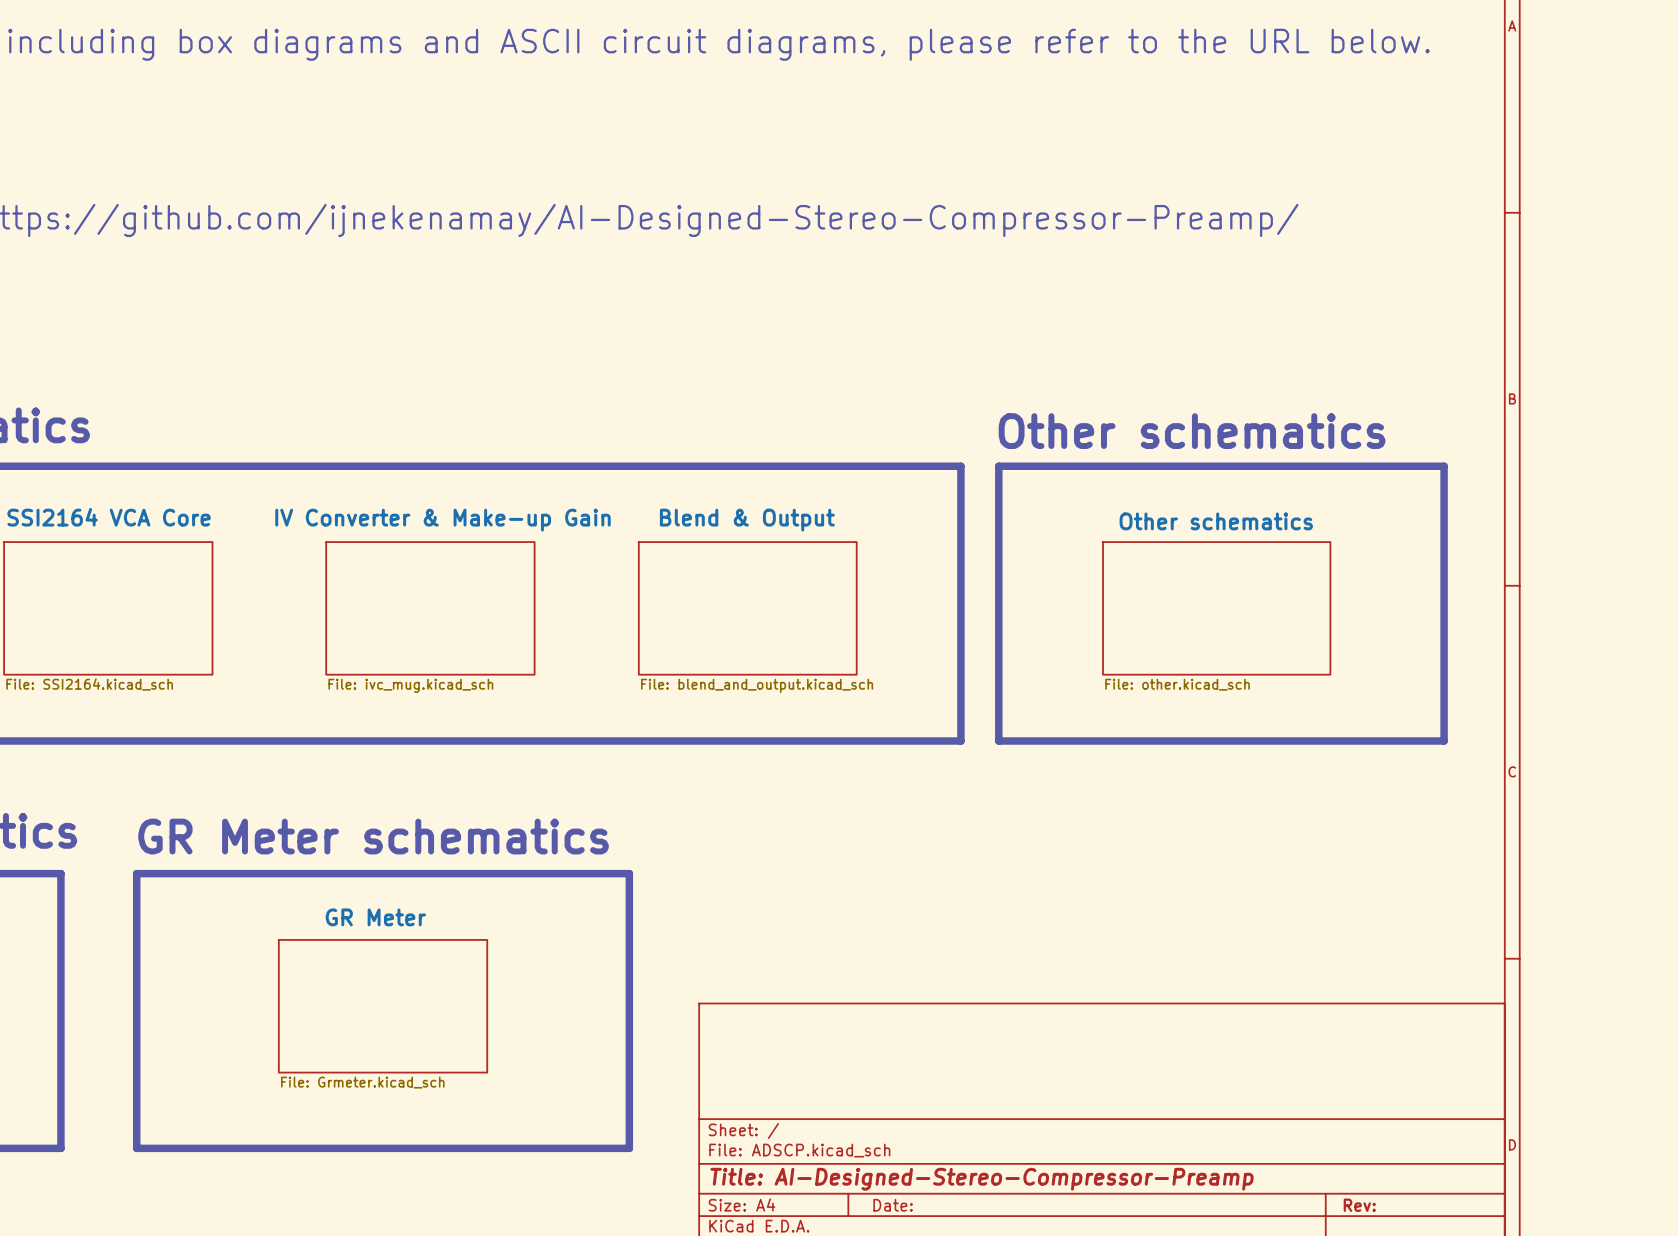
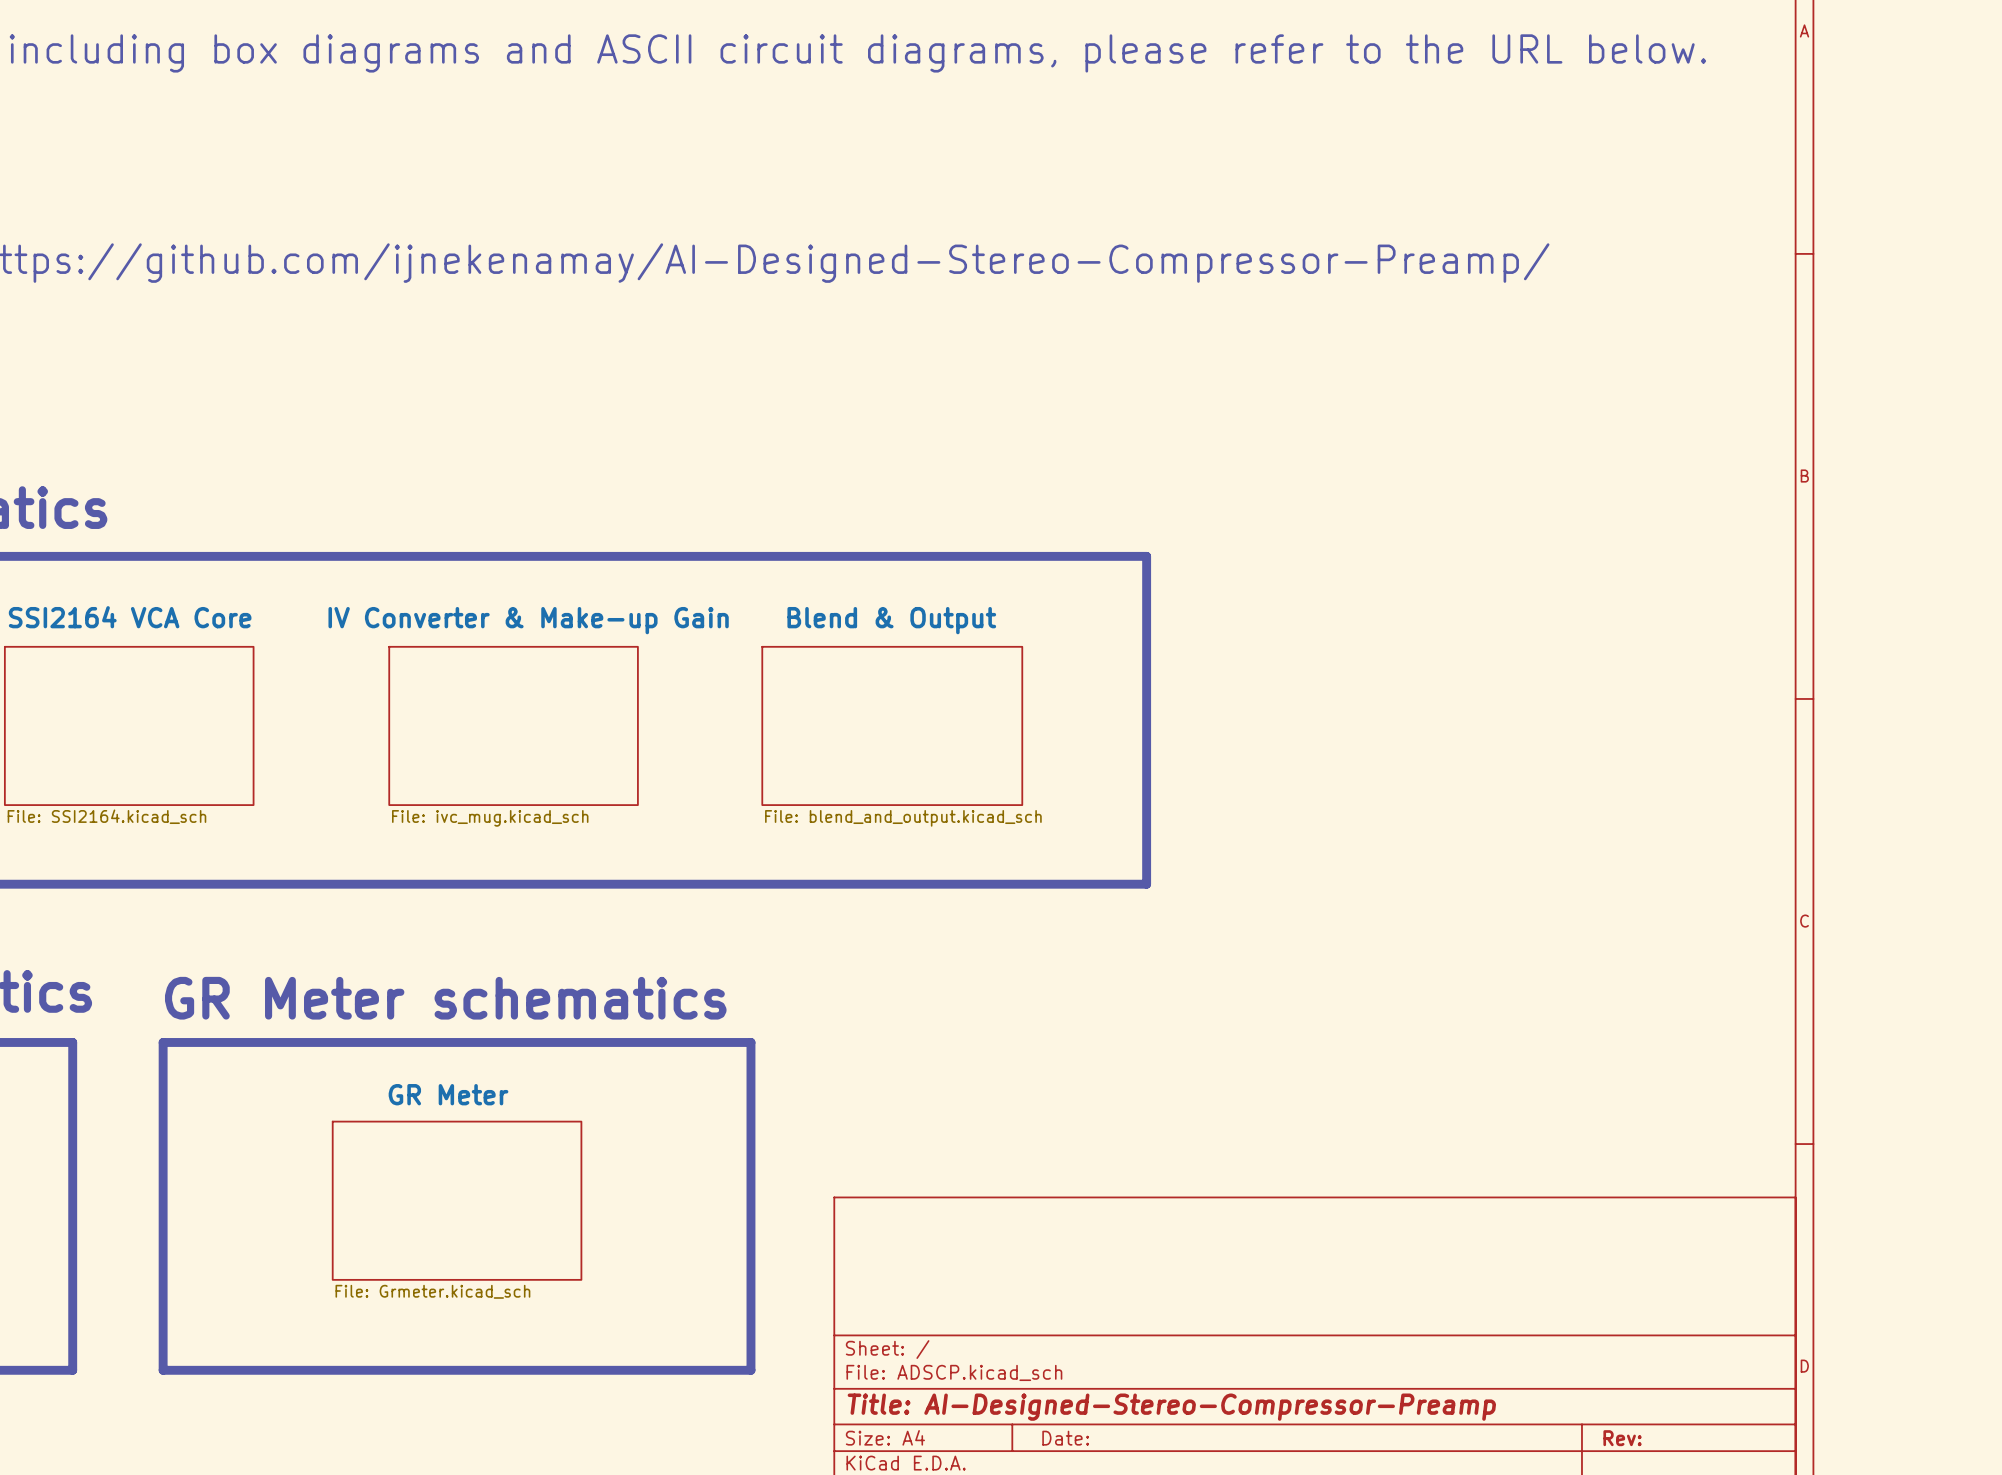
text: Other schematics (1192, 431) -> none
line: (998, 466) (1444, 466) (1444, 741) (998, 741) (998, 466) -> none
sheet Other schematics: File: other.kicad_sch (1216, 608) -> none

